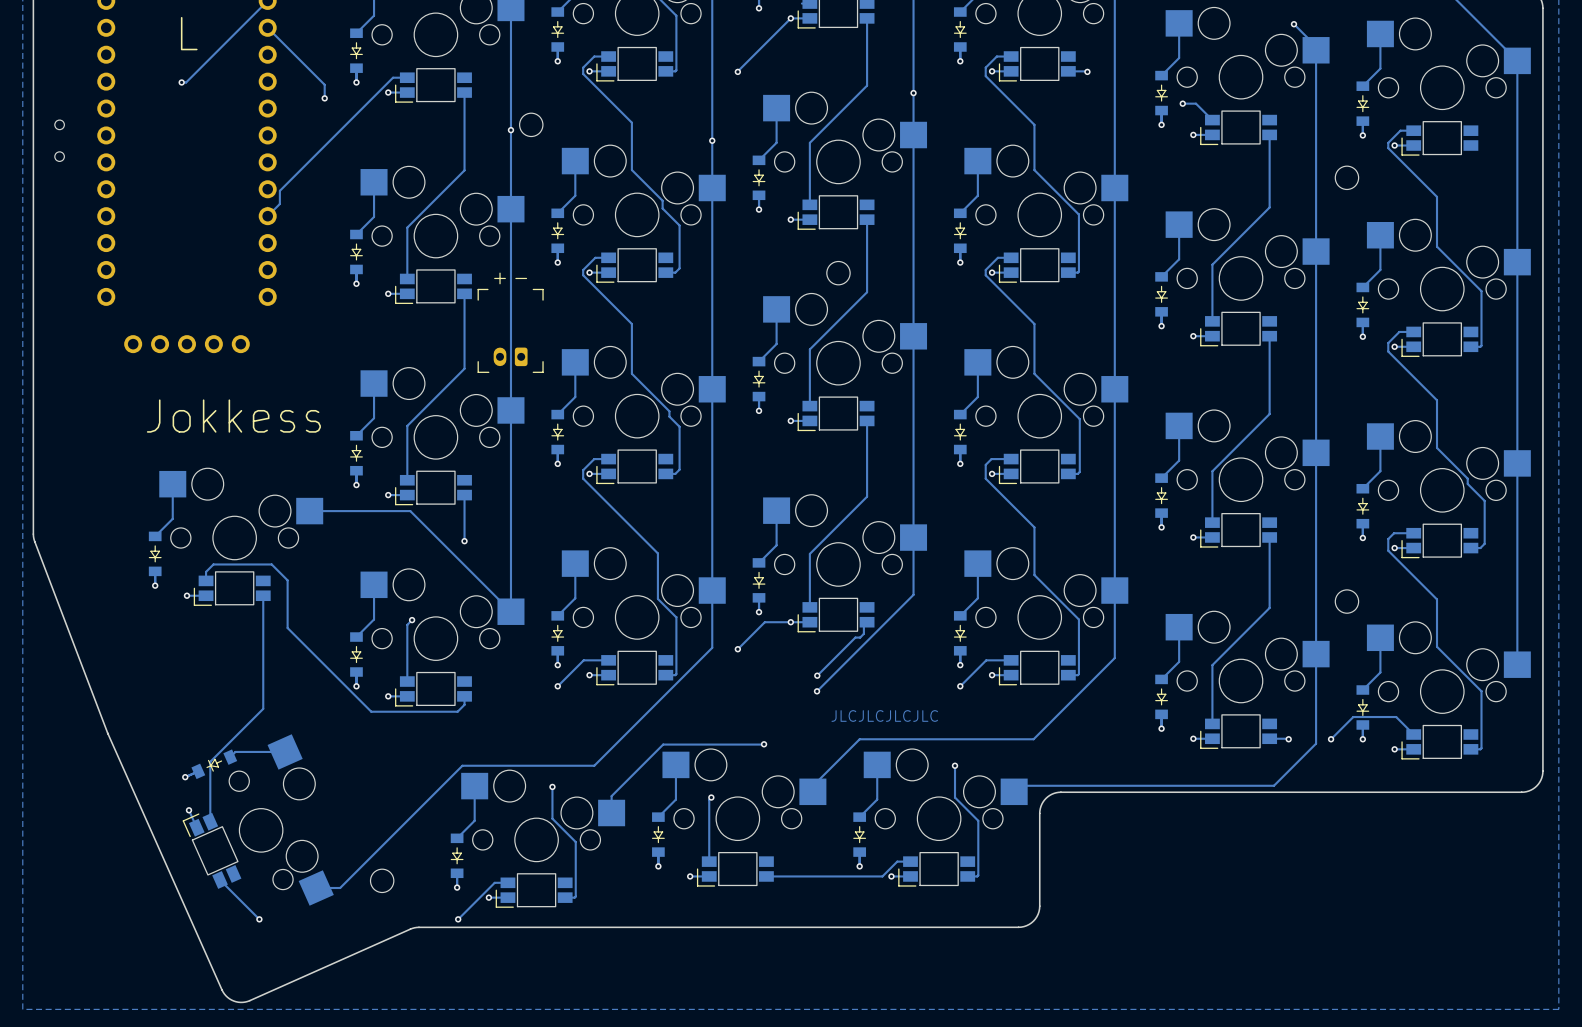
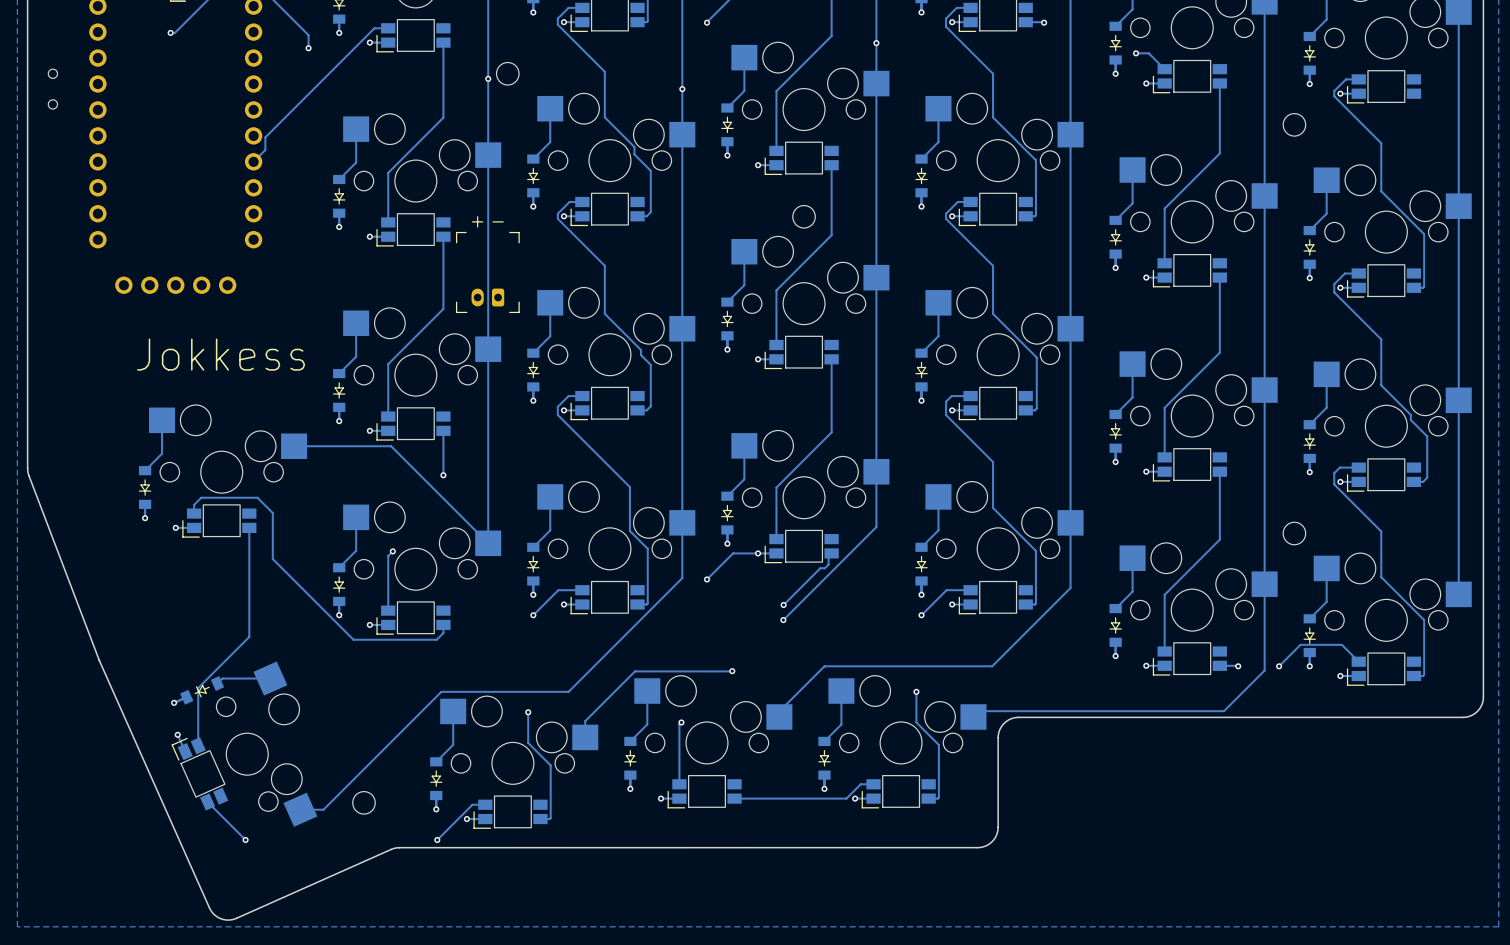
text: JLCJLCJLCJLC (884, 715) -> none

